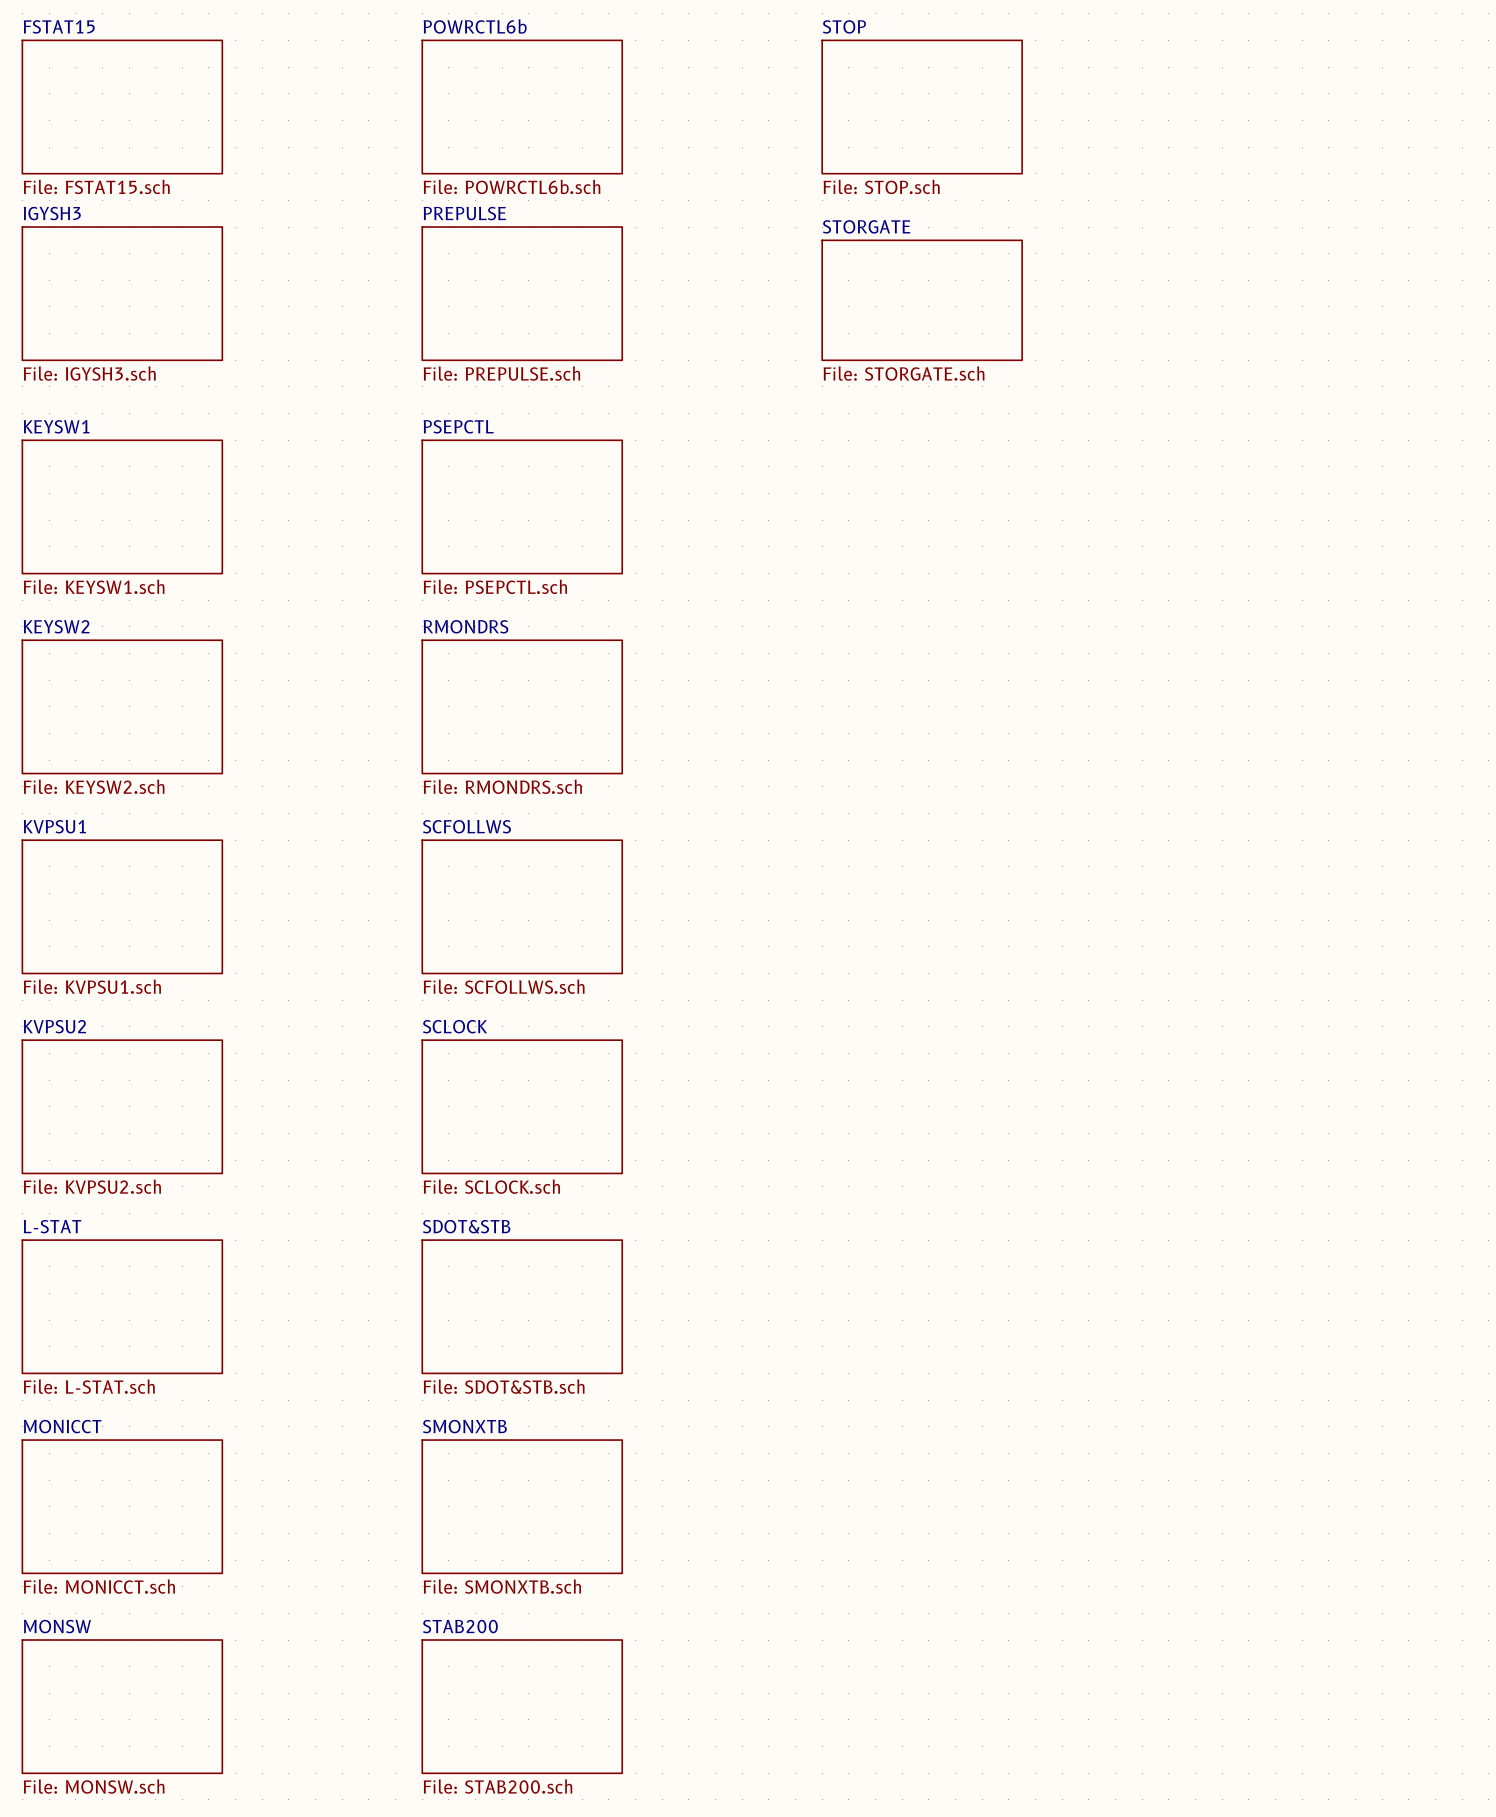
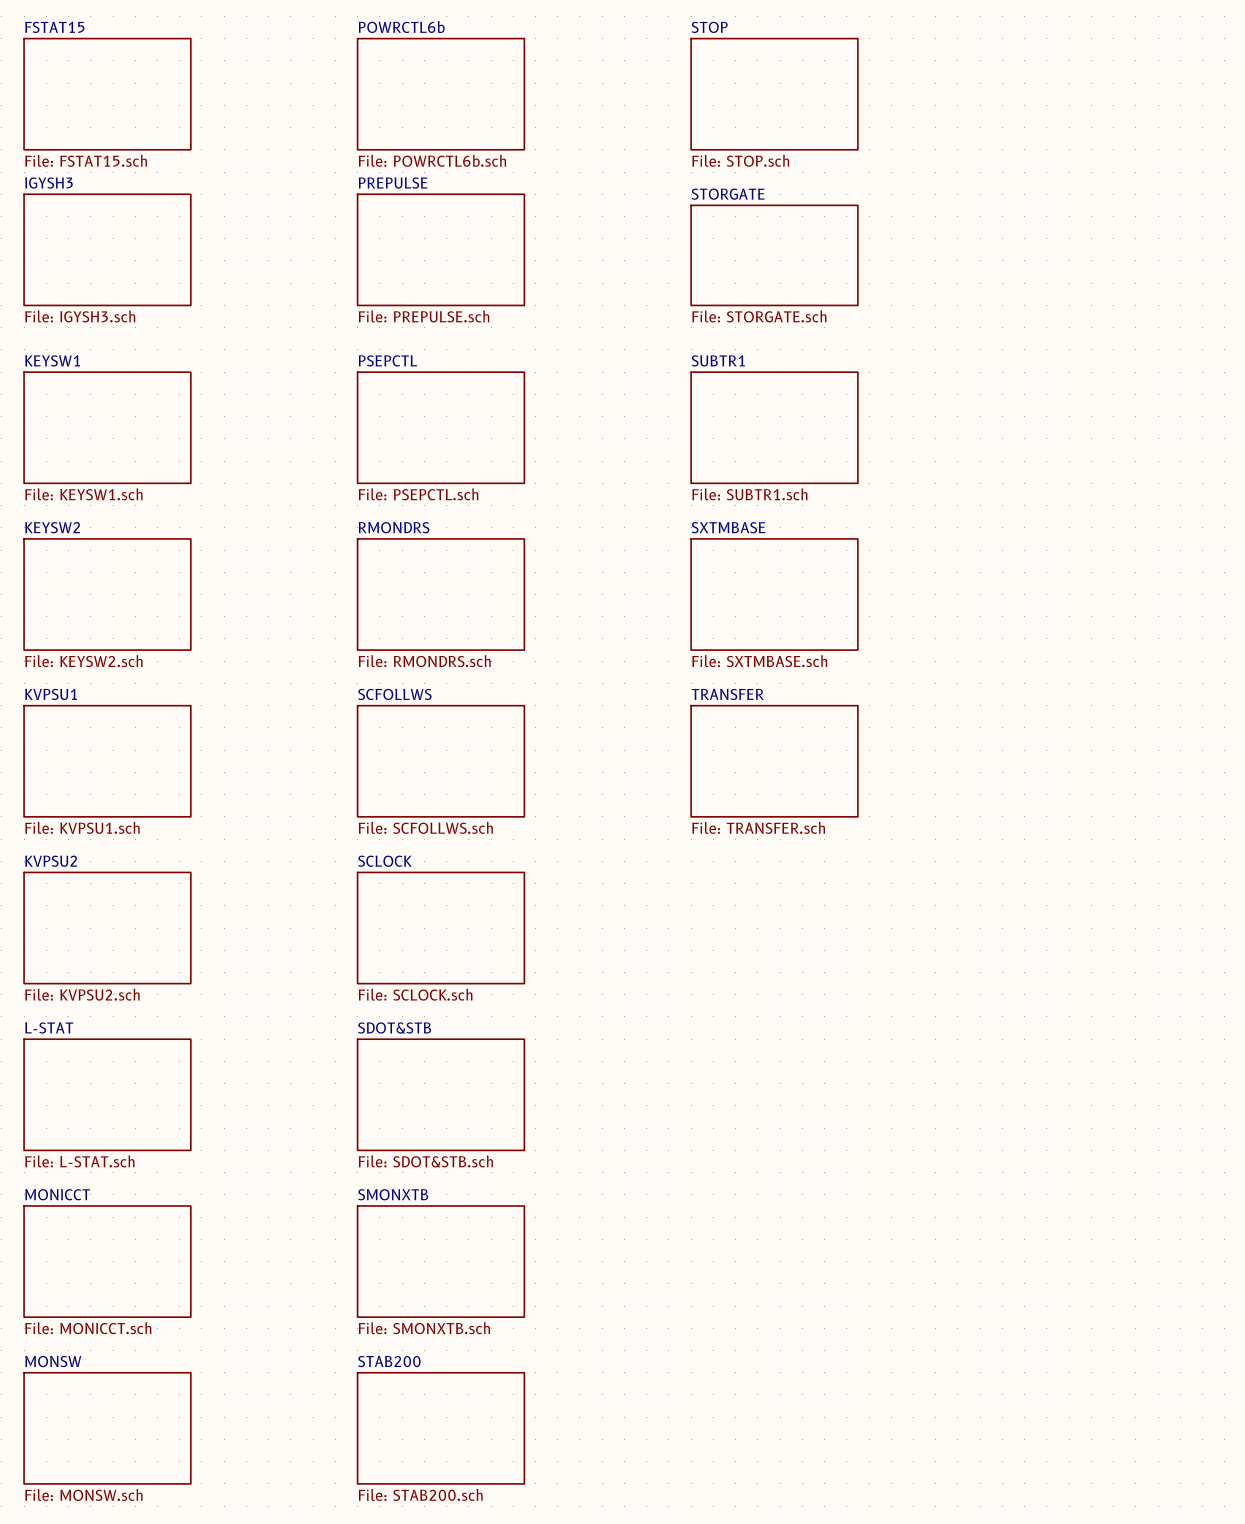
sheet SUBTR1: none -> File: SUBTR1.sch (774, 427)
sheet SXTMBASE: none -> File: SXTMBASE.sch (774, 594)
sheet TRANSFER: none -> File: TRANSFER.sch (774, 761)

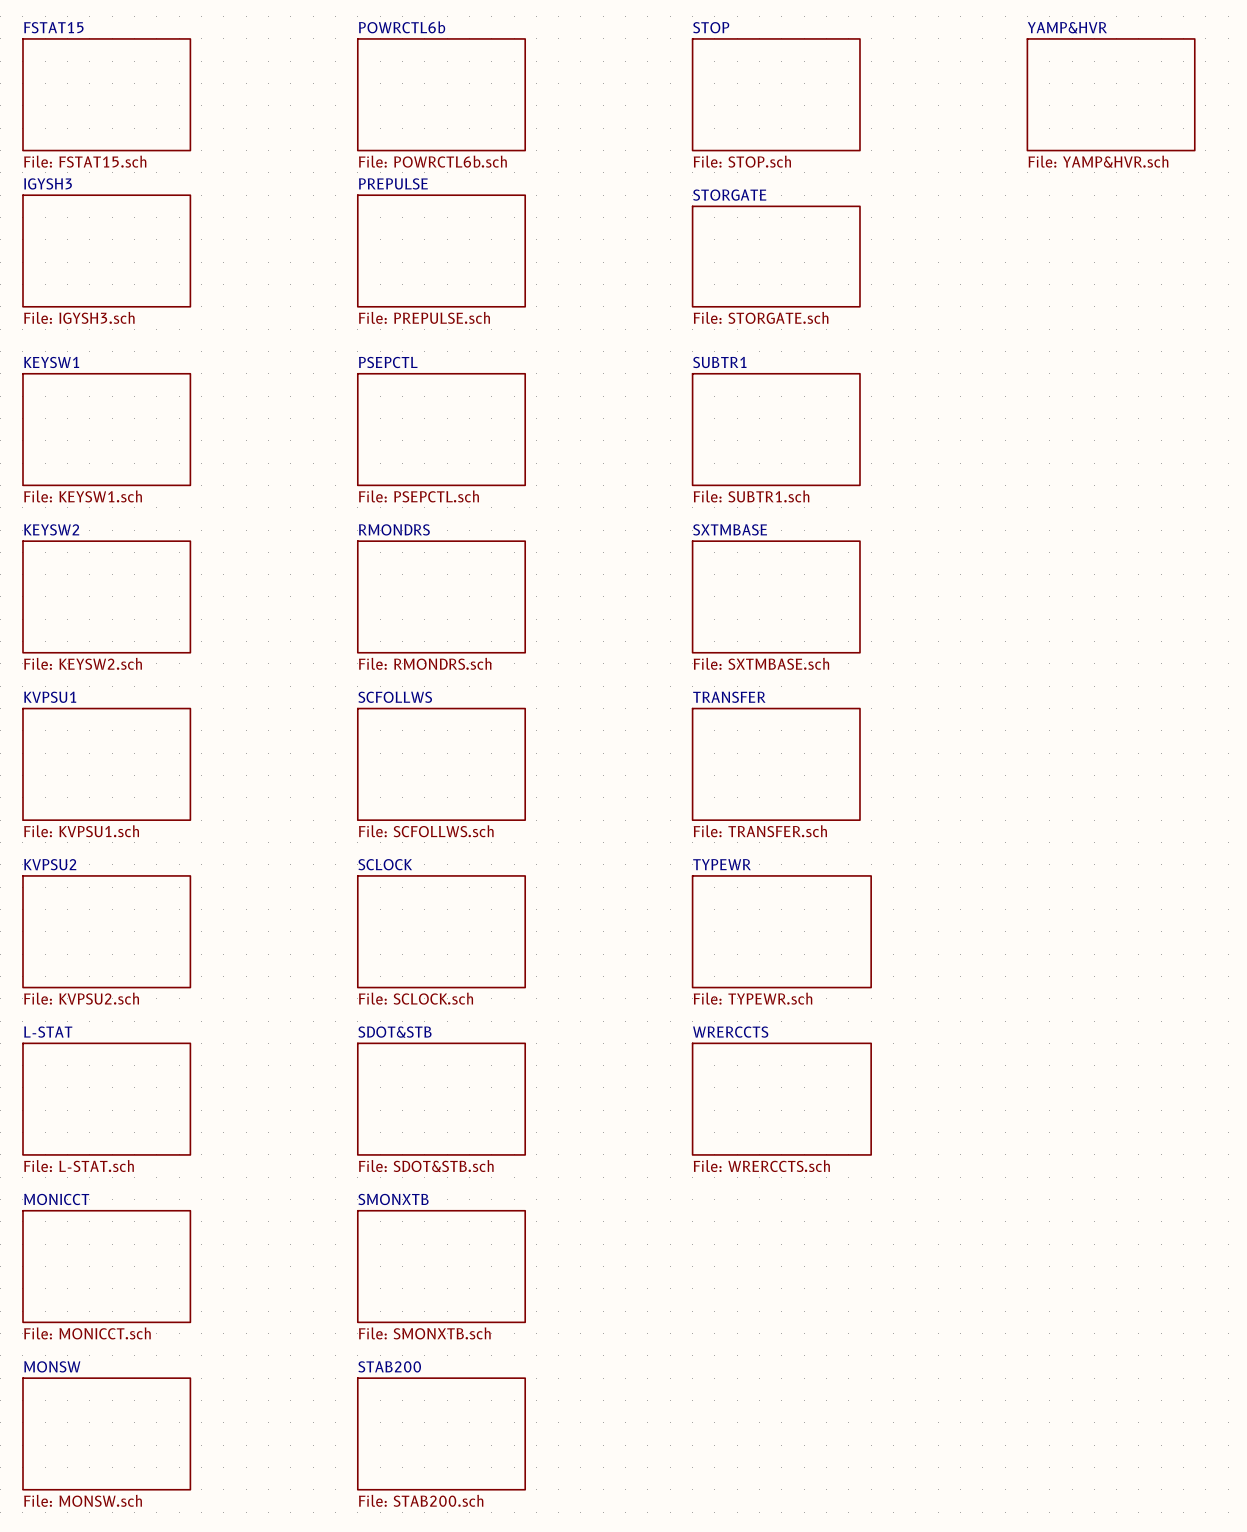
sheet YAMP&HVR: none -> File: YAMP&HVR.sch (1111, 94)
sheet TYPEWR: none -> File: TYPEWR.sch (781, 931)
sheet WRERCCTS: none -> File: WRERCCTS.sch (781, 1099)

